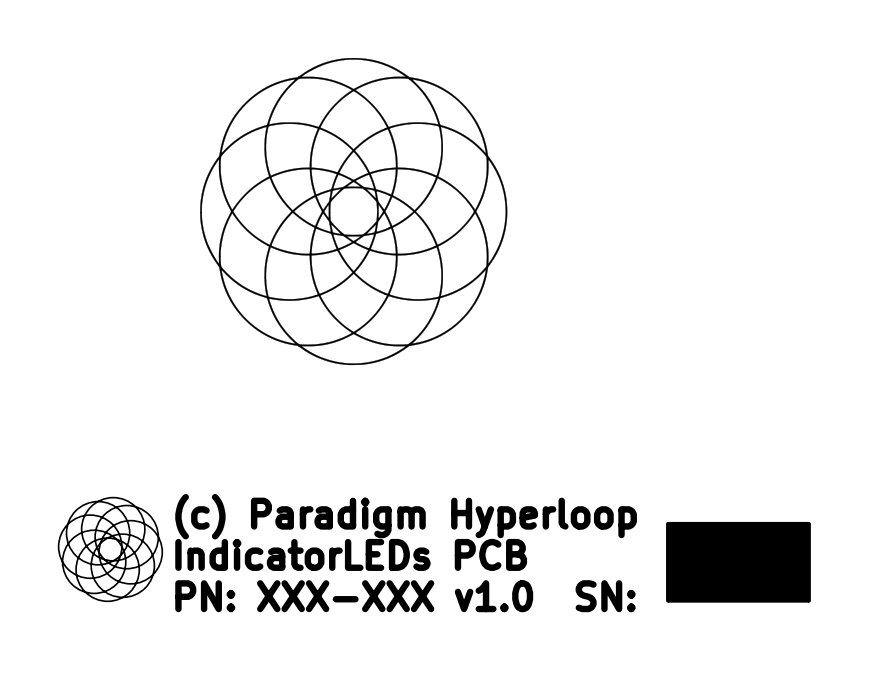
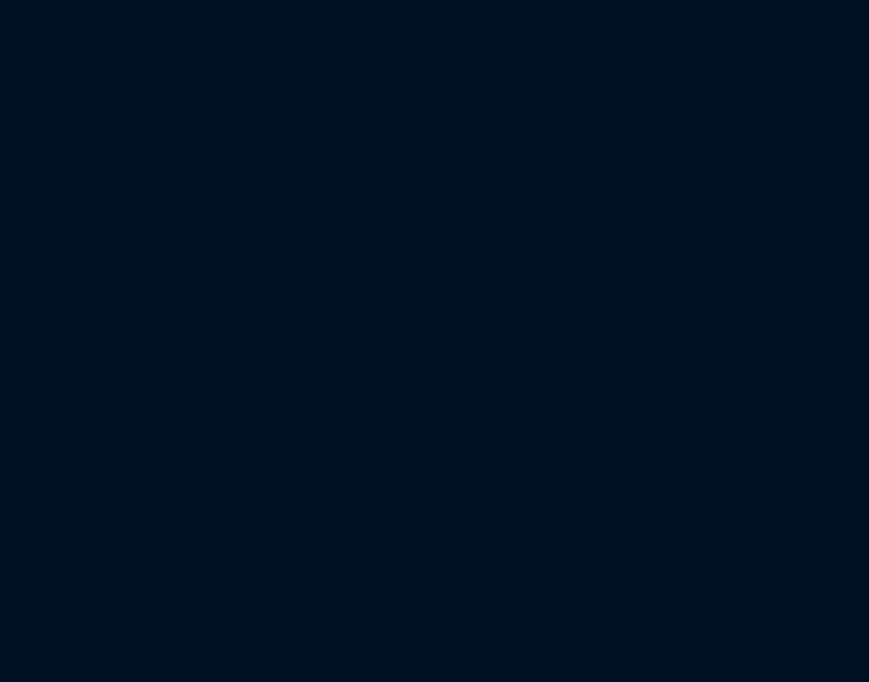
drawing: [200, 57, 508, 366] -> none
drawing: [57, 496, 163, 602] -> none
text: (c) Paradigm Hyperloop (406, 516) -> none
drawing: [666, 521, 811, 603] -> none
text: IndicatorLEDs PCB (351, 554) -> none
text: PN: XXX-XXX v1.0 SN: (405, 596) -> none

